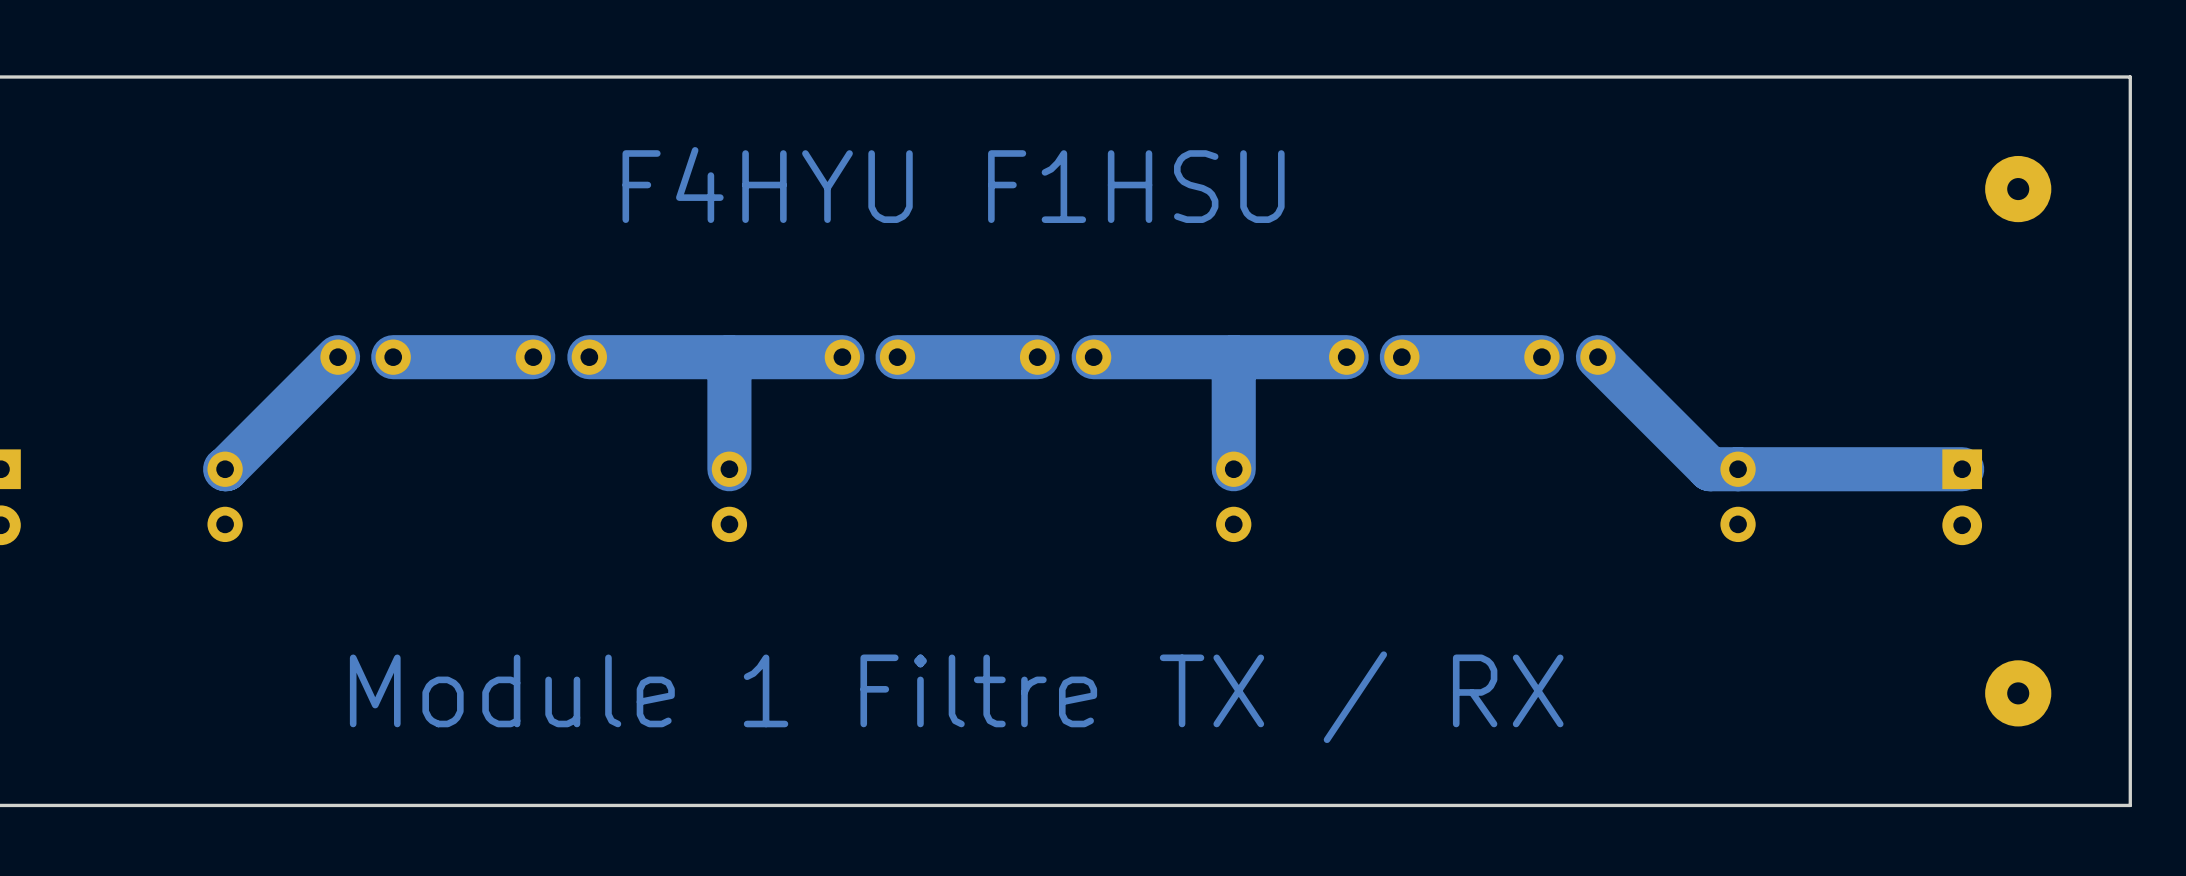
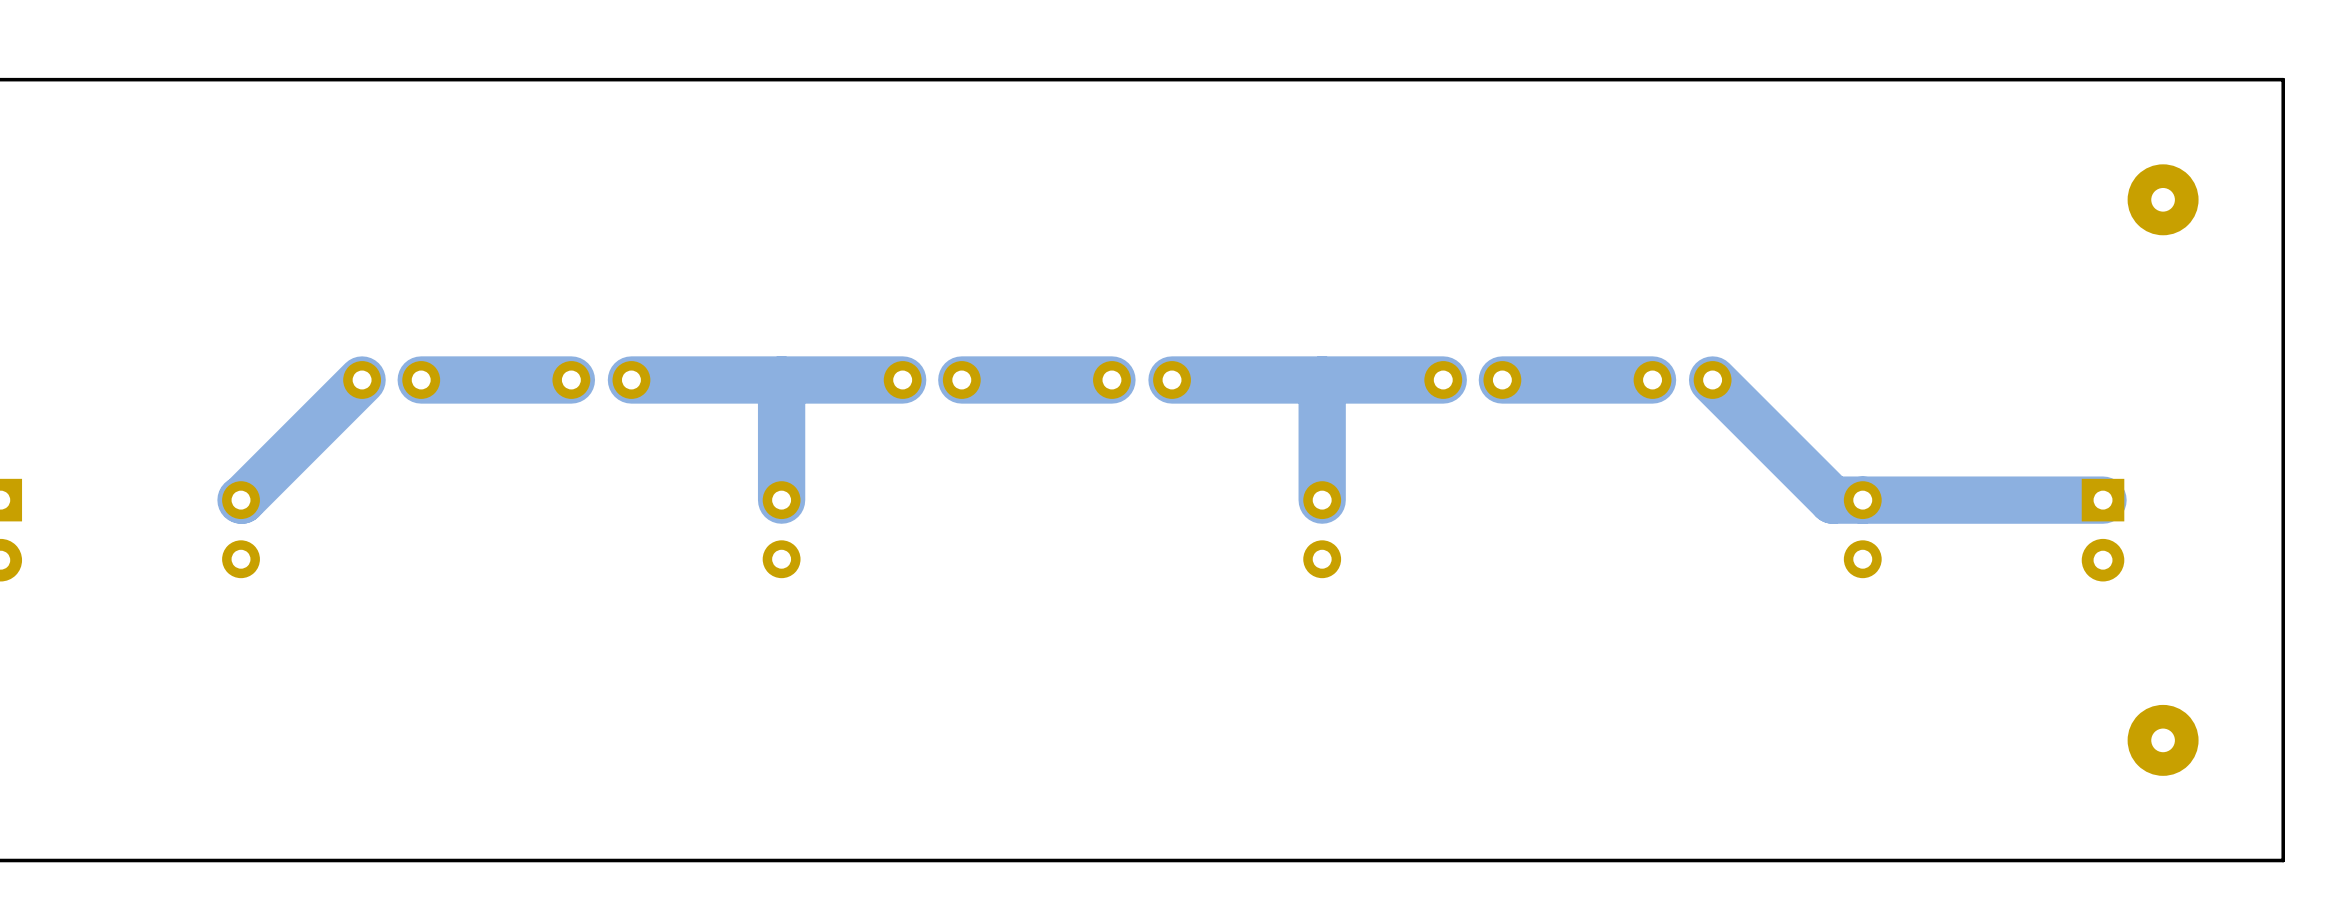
text: F4HYU F1HSU (953, 185) -> none
text: Module 1 Filtre TX / RX (956, 697) -> none

